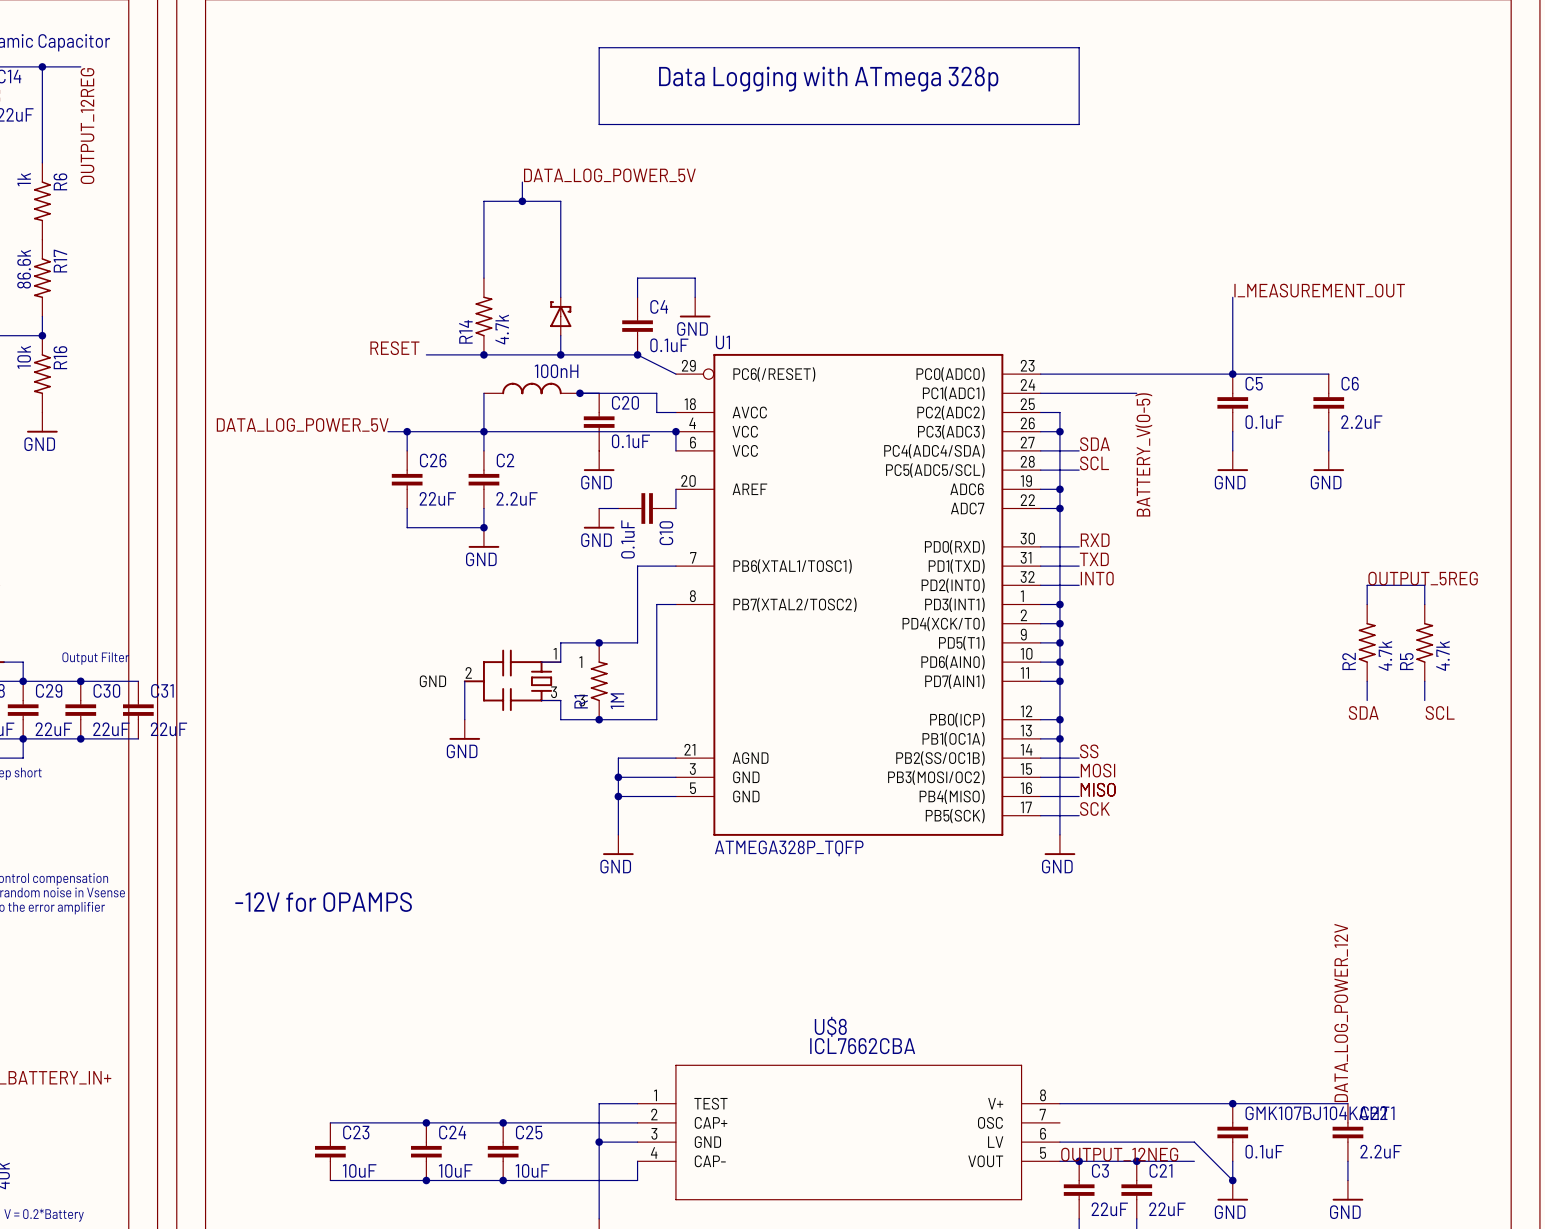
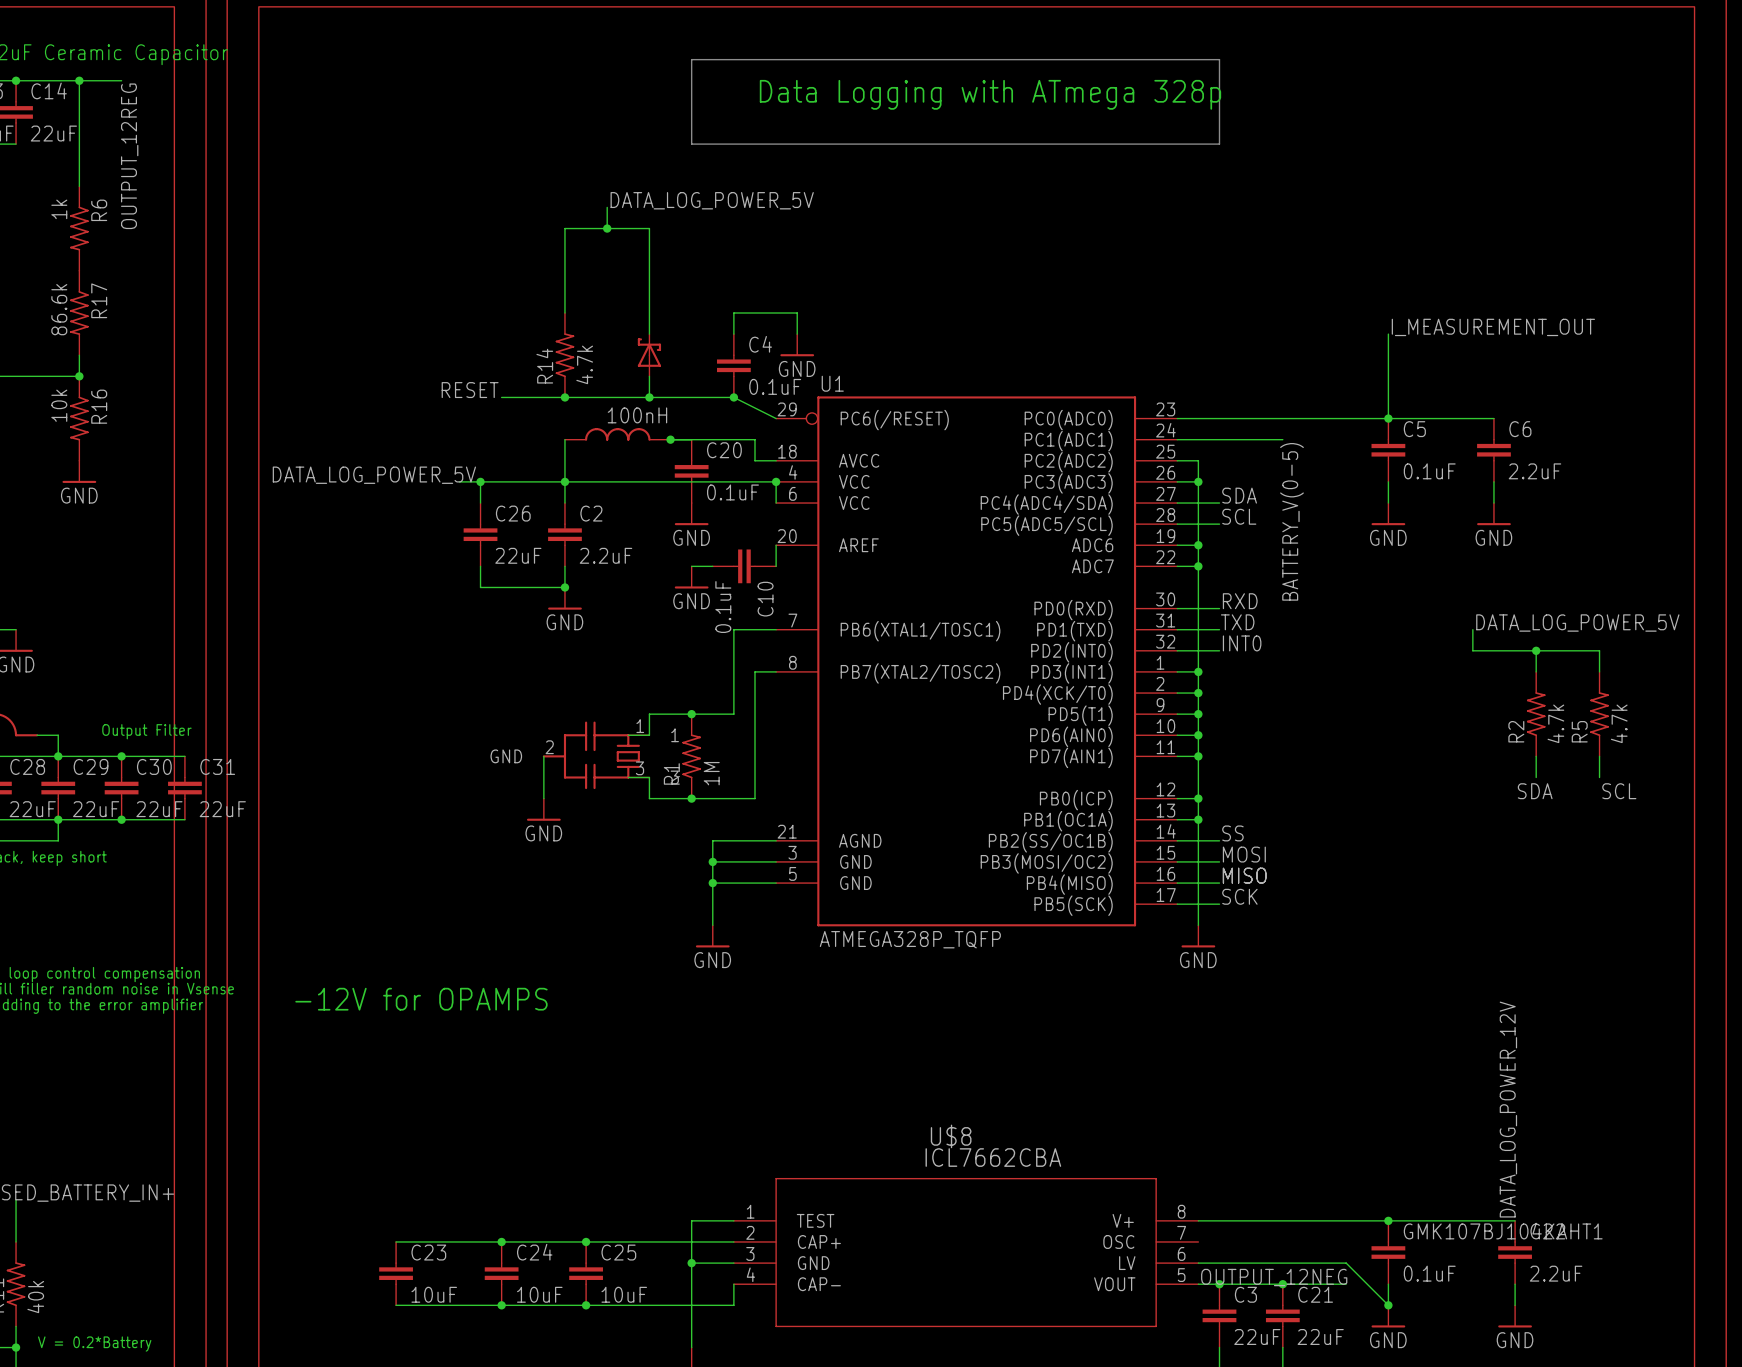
label: none -> DATA_LOG_POWER_5V (1577, 623)
wire: none -> (1472, 629) (1472, 650) (1536, 650)
label: OUTPUT_5REG (1423, 578) -> none
junction: none -> (1536, 650)

